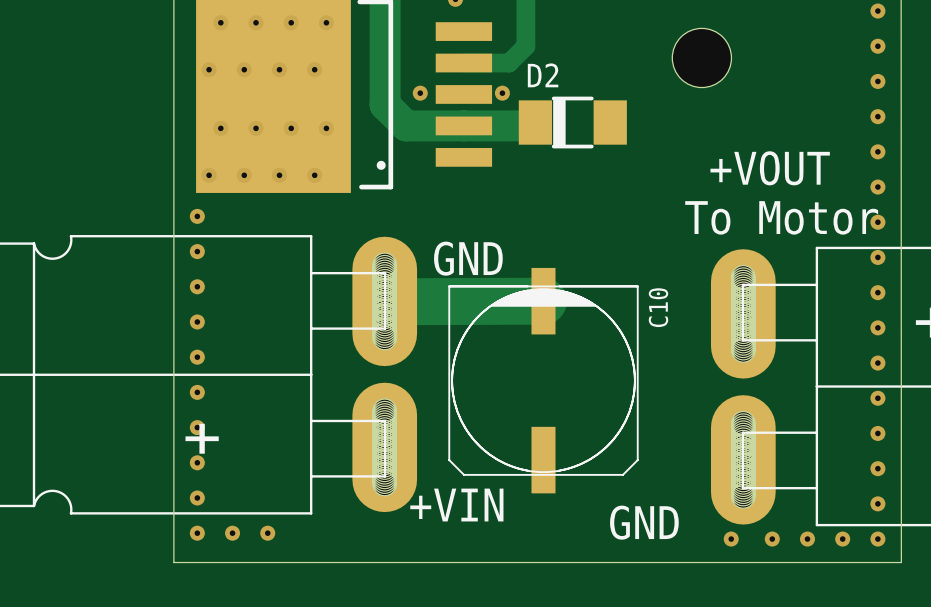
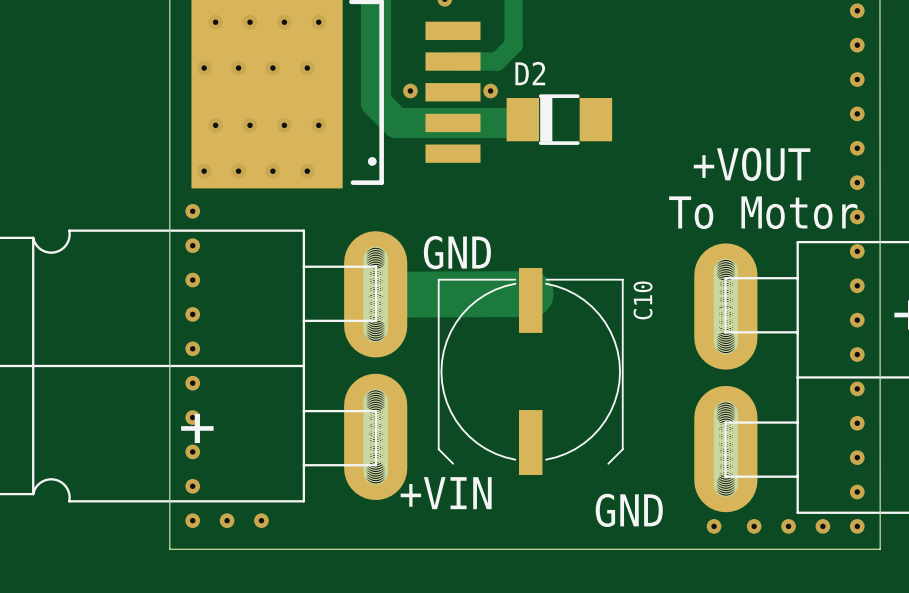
hole: (701, 57) -> none
C10 footprint: [448, 267, 639, 494] -> [437, 267, 624, 476]

